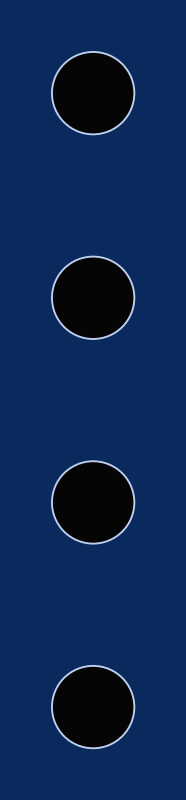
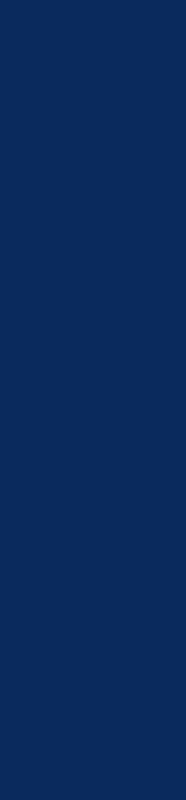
part: (93, 93) -> none
part: (93, 297) -> none
part: (93, 502) -> none
part: (93, 707) -> none

